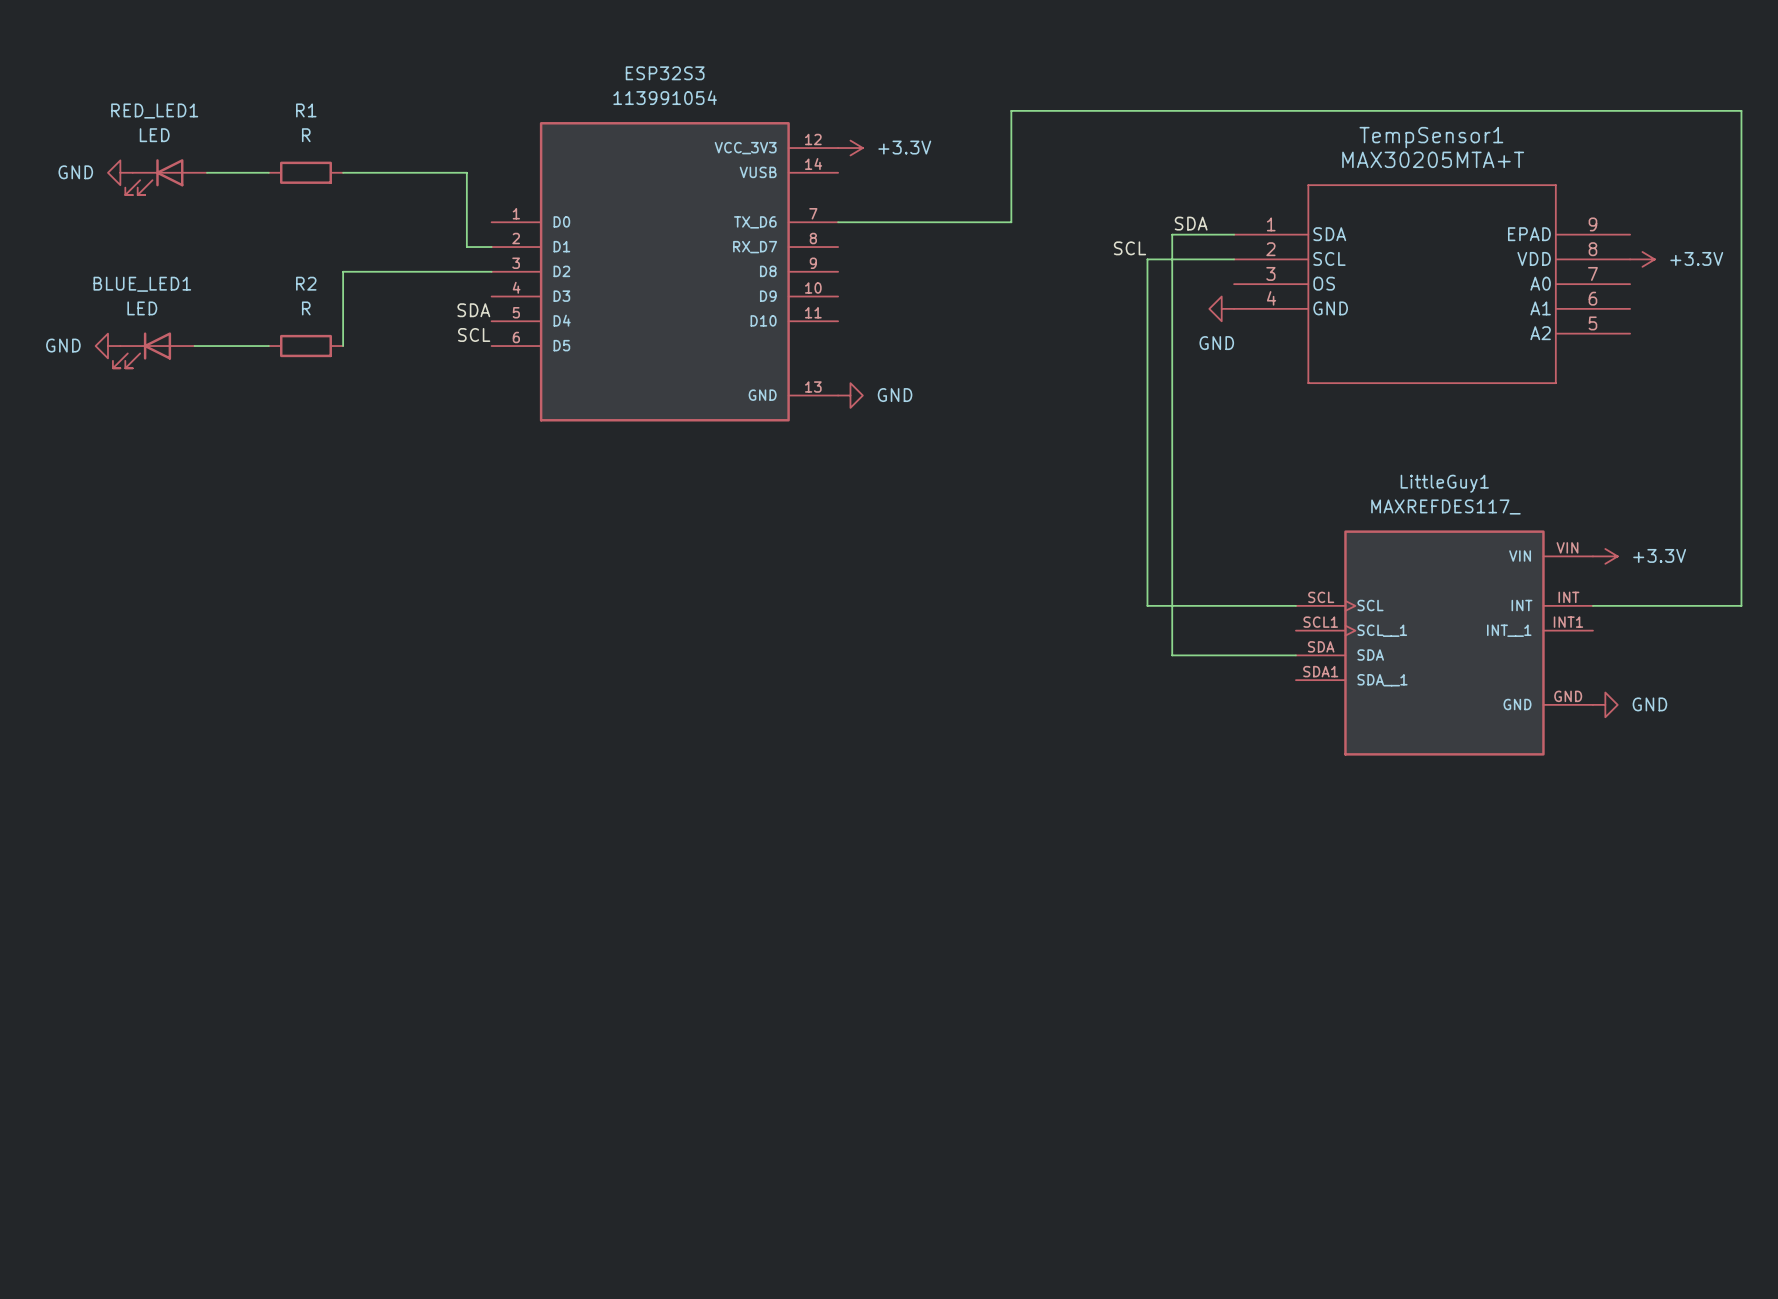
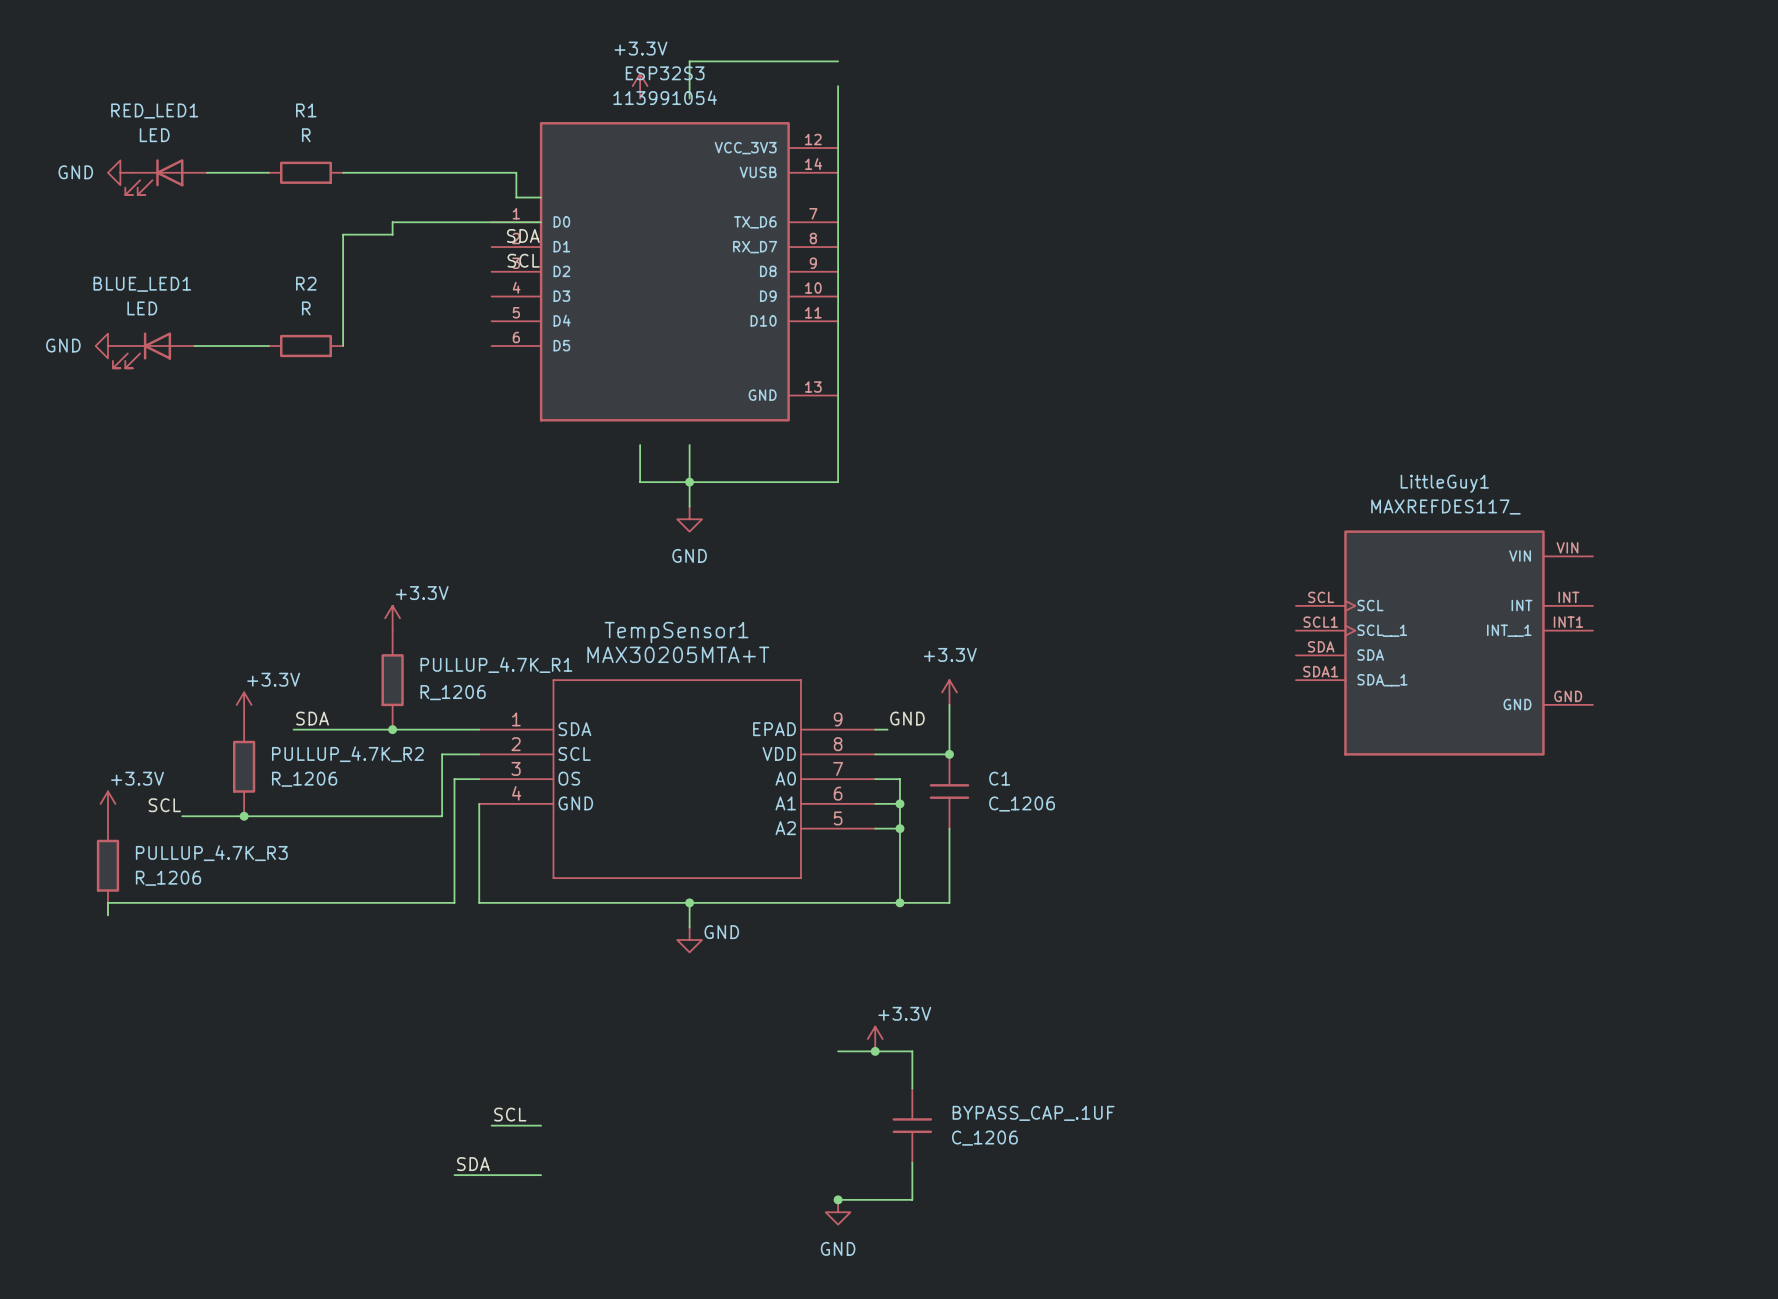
wire: none -> (838, 61) (689, 61) (689, 98)
wire: none -> (838, 86) (838, 482) (640, 482) (640, 445)
power symbol text position: +3.3V (904, 147) -> +3.3V (640, 48)
power symbol rotation: 0° (850, 148) -> 90° counterclockwise (640, 86)
power symbol position: +3.3V (850, 148) -> +3.3V (640, 86)
wire: (466, 172) (466, 247) (491, 247) -> (466, 172) (516, 172) (516, 197) (541, 197)
wire: (838, 222) (1011, 222) (1011, 110) (1741, 110) (1741, 605) (1592, 605) -> none
label: SDA (1191, 223) -> none
wire: (1234, 234) (1172, 234) (1172, 655) (1295, 655) -> none
label: SCL (1129, 248) -> none
wire: (1234, 259) (1147, 259) (1147, 605) (1295, 605) -> none
power symbol: +3.3V (1642, 259) -> none
wire: (343, 271) (491, 271) -> (343, 271) (343, 234) (392, 234) (392, 222) (541, 222)
TempSensor1 position: (1432, 284) -> (677, 779)
power symbol: GND (1221, 308) -> none
label position: SDA (473, 310) -> SDA (523, 235)
label position: SCL (474, 334) -> SCL (523, 260)
power symbol rotation: 0° (850, 395) -> 90° clockwise (689, 519)
power symbol position: GND (850, 395) -> GND (689, 519)
wire: none -> (689, 445) (689, 506)
junction: none -> (689, 482)
power symbol: +3.3V (1605, 556) -> none
power symbol: none -> +3.3V (392, 618)
PULLUP_4.7K_R1: none -> R_1206 (392, 680)
power symbol: none -> +3.3V (949, 692)
power symbol: none -> +3.3V (244, 704)
wire: none -> (949, 704) (949, 754) (875, 754)
power symbol: GND (1605, 704) -> none
label: none -> SDA (312, 718)
label: none -> GND (907, 718)
wire: none -> (293, 729) (479, 729)
junction: none -> (392, 729)
wire: none -> (875, 729) (887, 729)
wire: none -> (479, 754) (442, 754) (442, 816) (182, 816)
junction: none -> (949, 754)
PULLUP_4.7K_R2: none -> R_1206 (244, 766)
wire: none -> (479, 779) (454, 779) (454, 902) (107, 902) (107, 915)
wire: none -> (875, 779) (899, 779) (899, 902)
C1: none -> C_1206 (949, 791)
power symbol: none -> +3.3V (107, 803)
wire: none -> (479, 803) (479, 902) (949, 902) (949, 828)
wire: none -> (875, 803) (899, 803)
junction: none -> (899, 803)
label: none -> SCL (164, 805)
junction: none -> (244, 816)
wire: none -> (875, 828) (899, 828)
junction: none -> (899, 828)
PULLUP_4.7K_R3: none -> R_1206 (107, 865)
wire: none -> (689, 902) (689, 927)
junction: none -> (689, 902)
junction: none -> (899, 902)
power symbol: none -> GND (689, 940)
power symbol: none -> +3.3V (875, 1039)
wire: none -> (838, 1051) (912, 1051) (912, 1088)
junction: none -> (875, 1051)
label: none -> SCL (510, 1114)
wire: none -> (491, 1125) (541, 1125)
BYPASS_CAP_.1UF: none -> C_1206 (912, 1125)
wire: none -> (912, 1162) (912, 1199) (838, 1199)
label: none -> SDA (473, 1164)
wire: none -> (454, 1175) (541, 1175)
junction: none -> (838, 1199)
power symbol: none -> GND (838, 1212)

